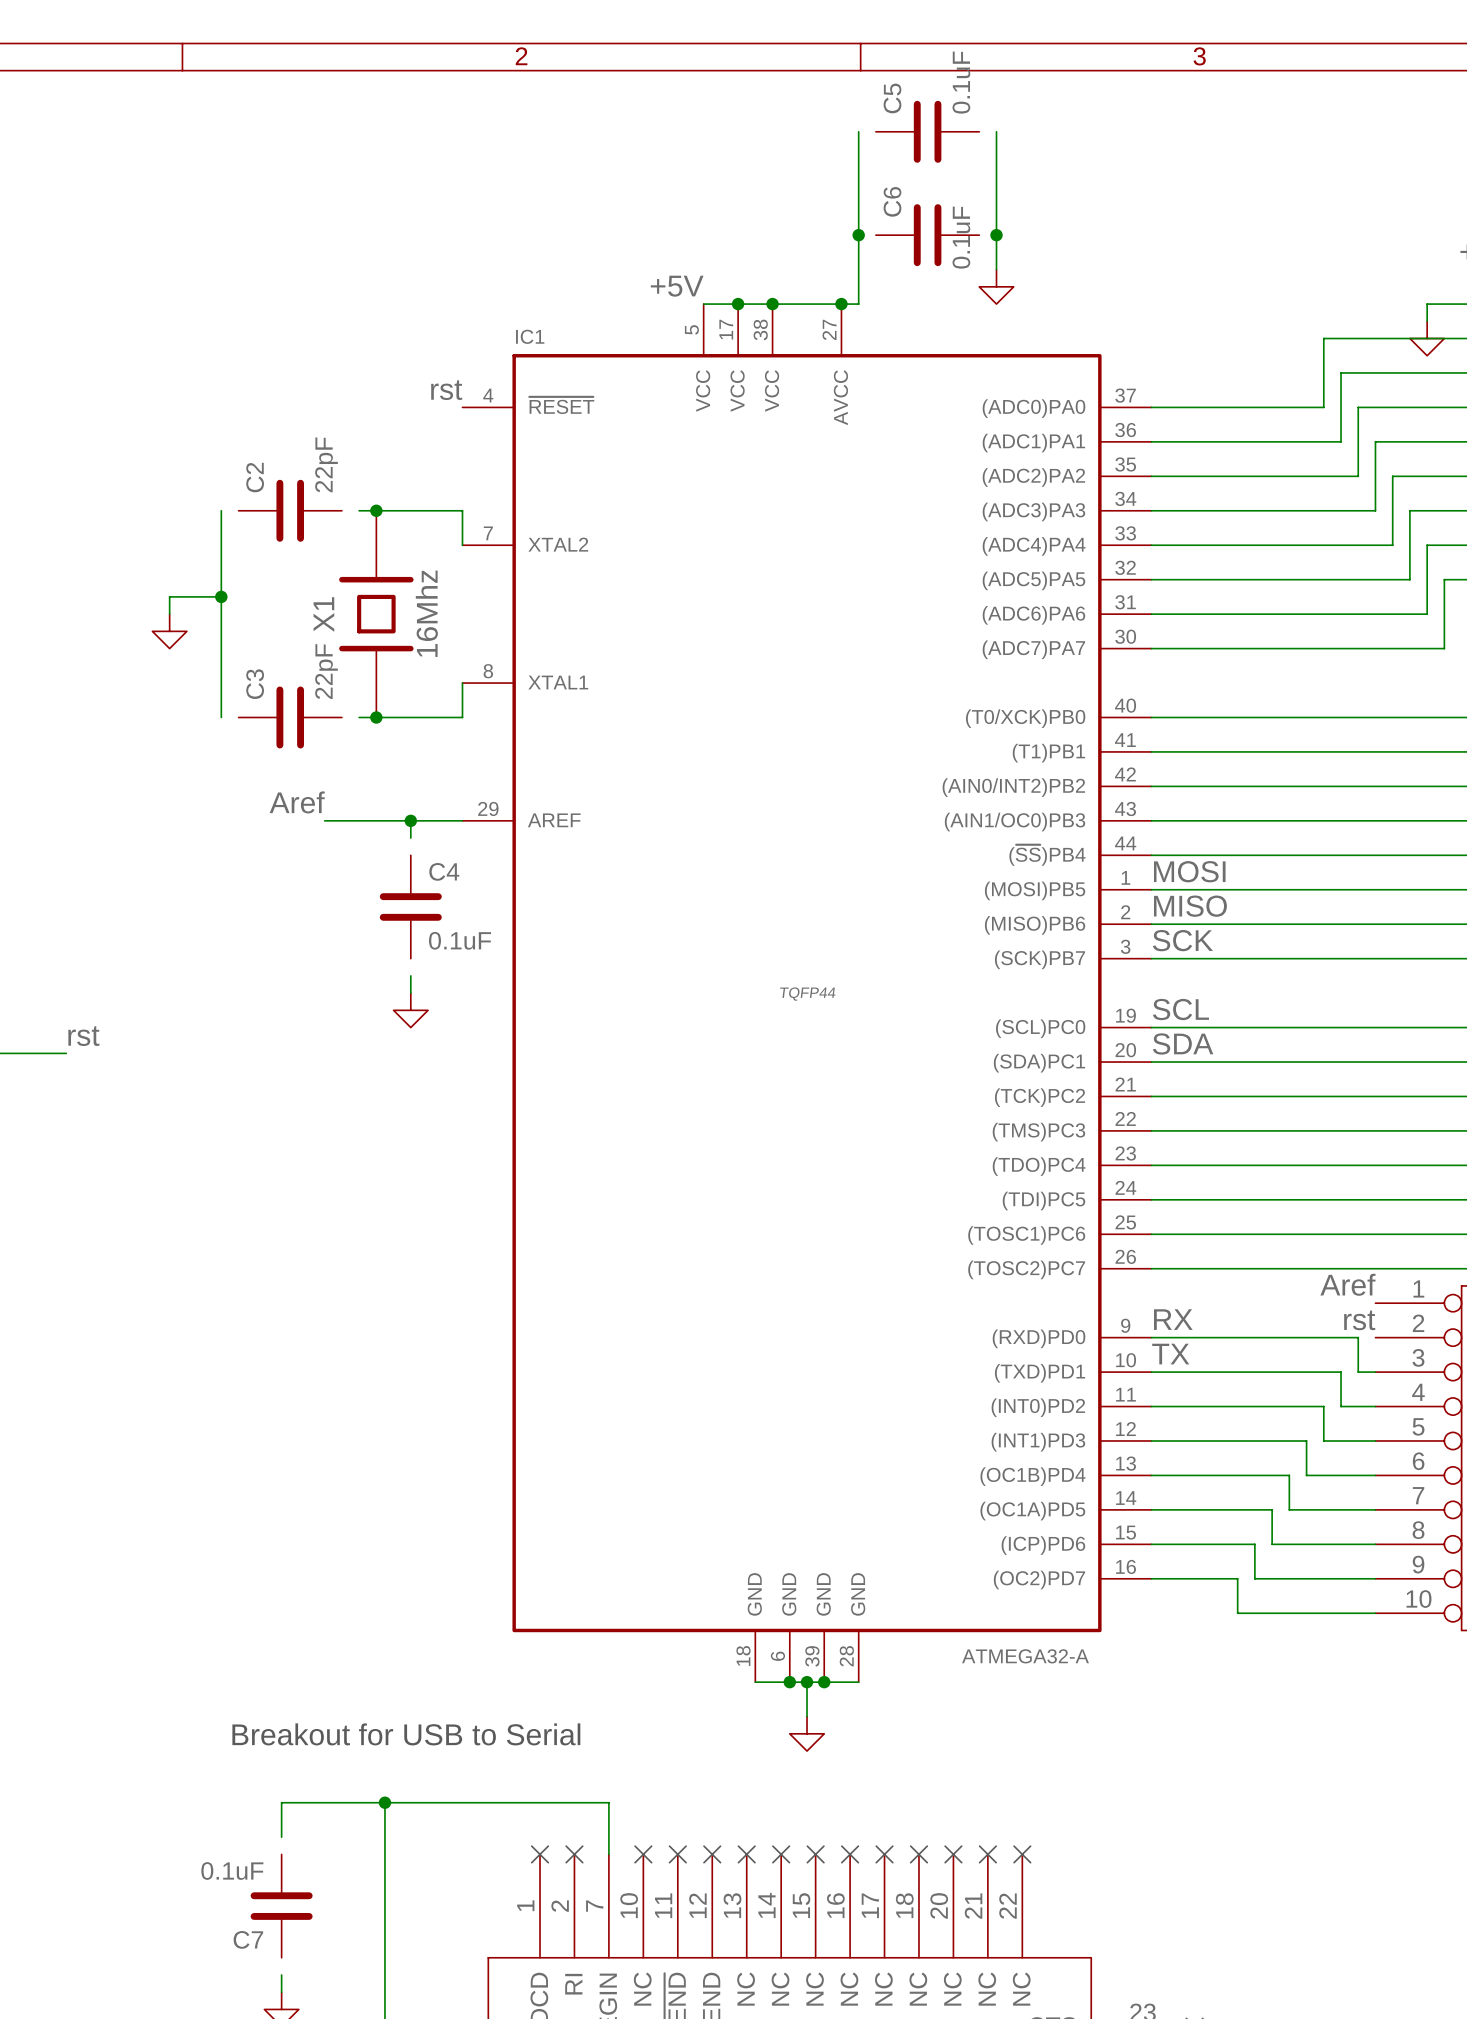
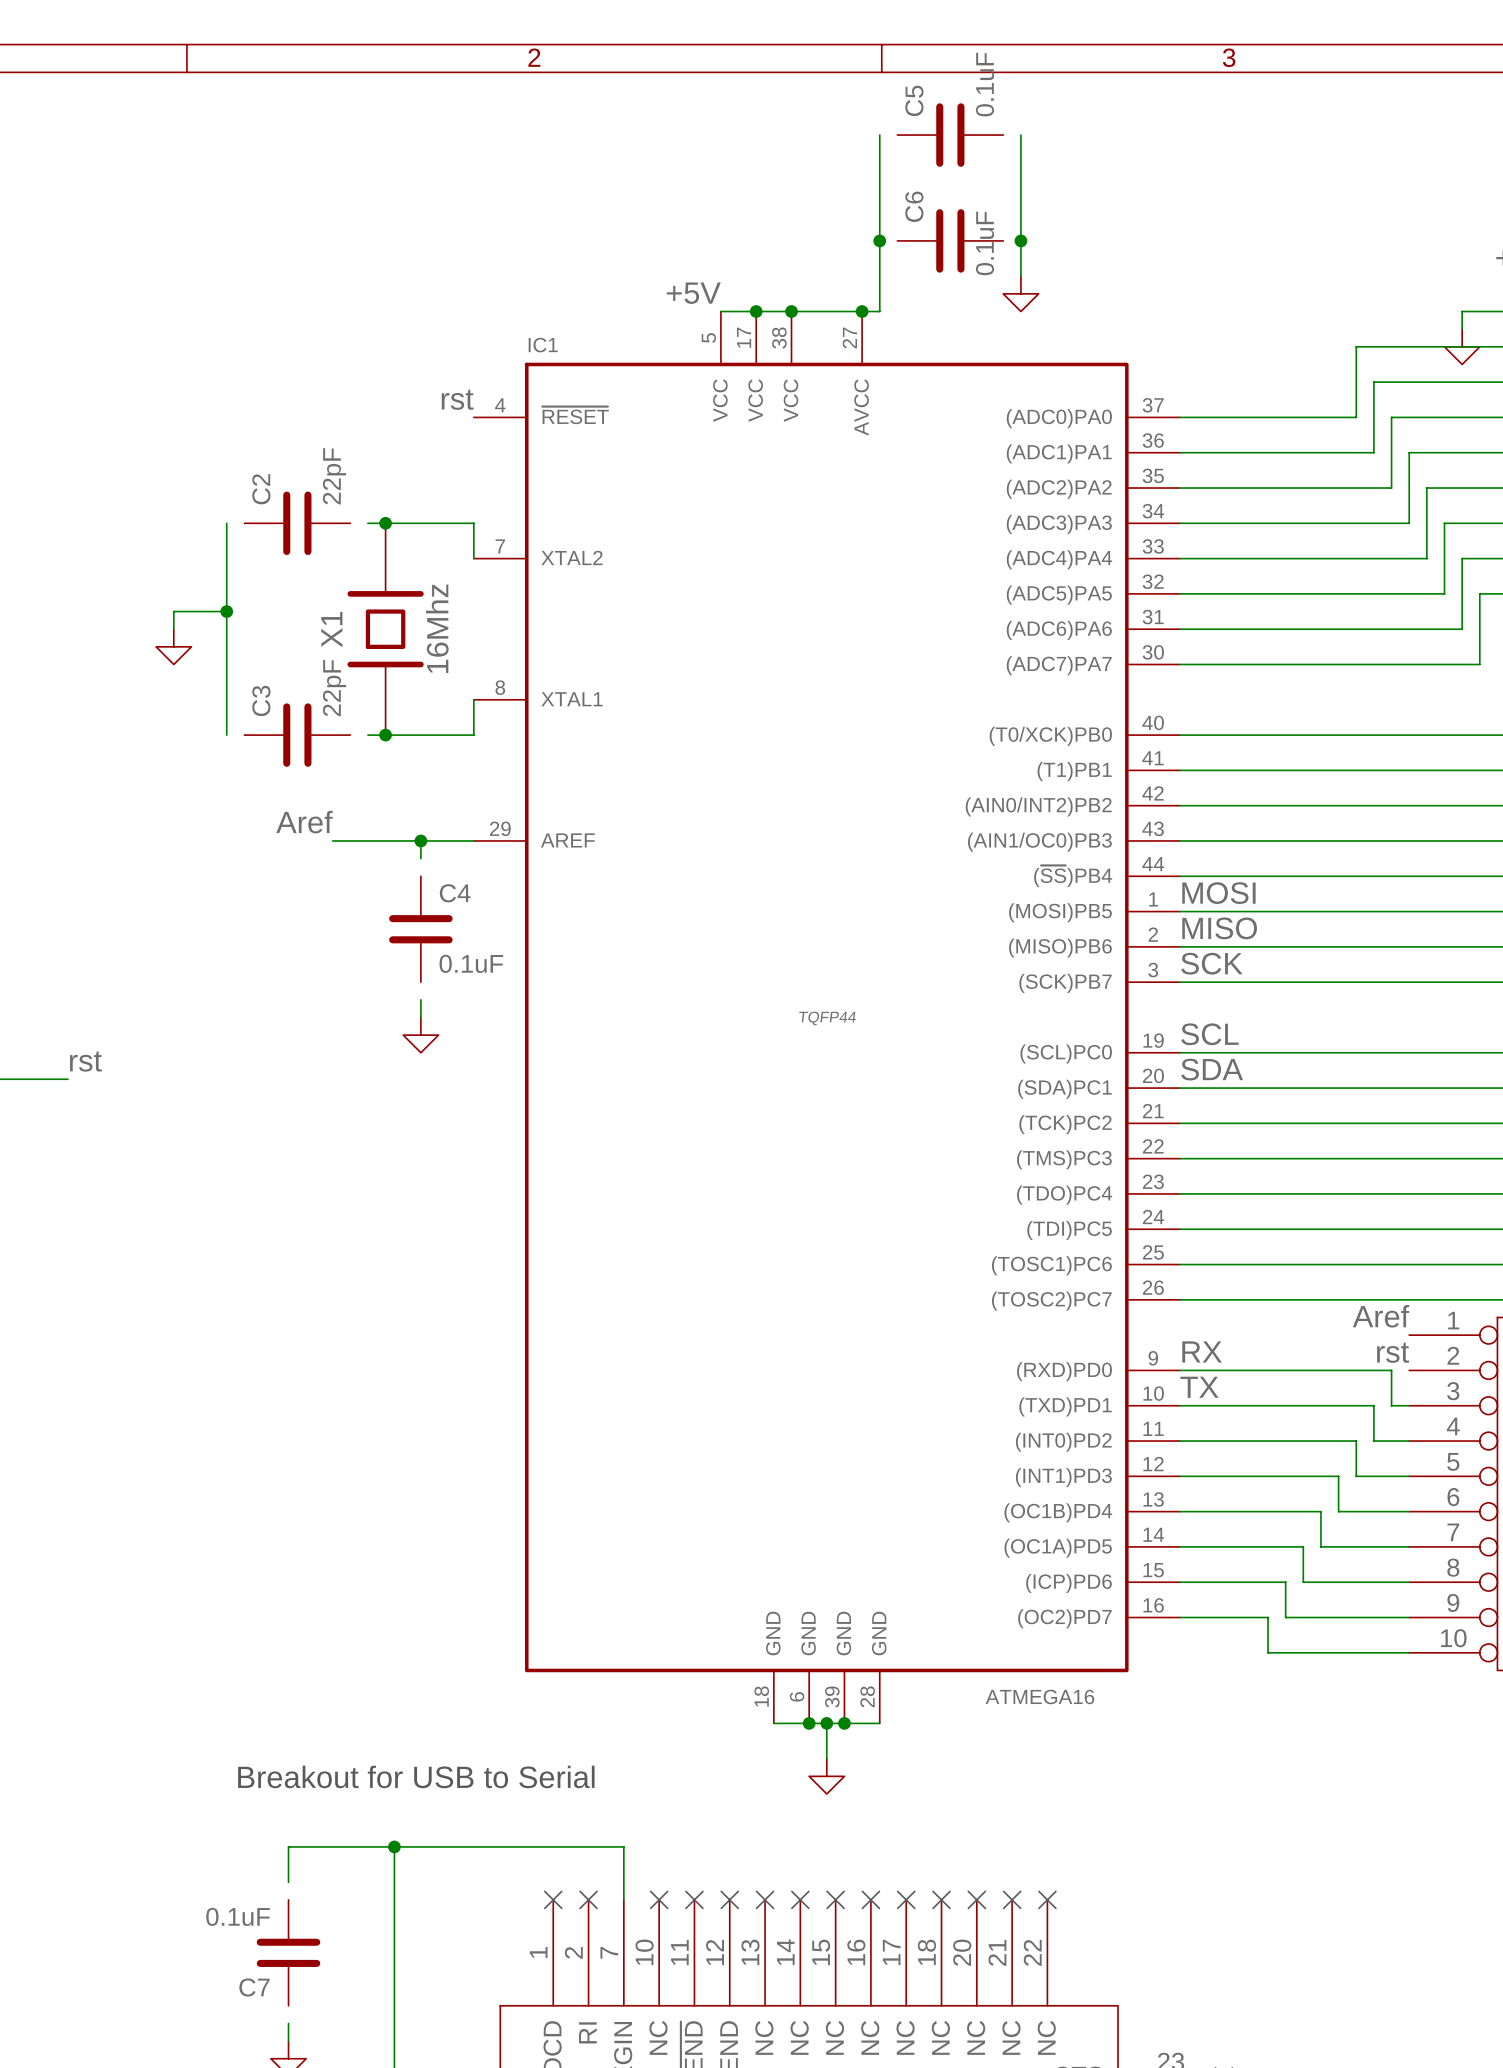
IC1 value: ATMEGA32-A (1025, 1656) -> ATMEGA16 (1039, 1696)

